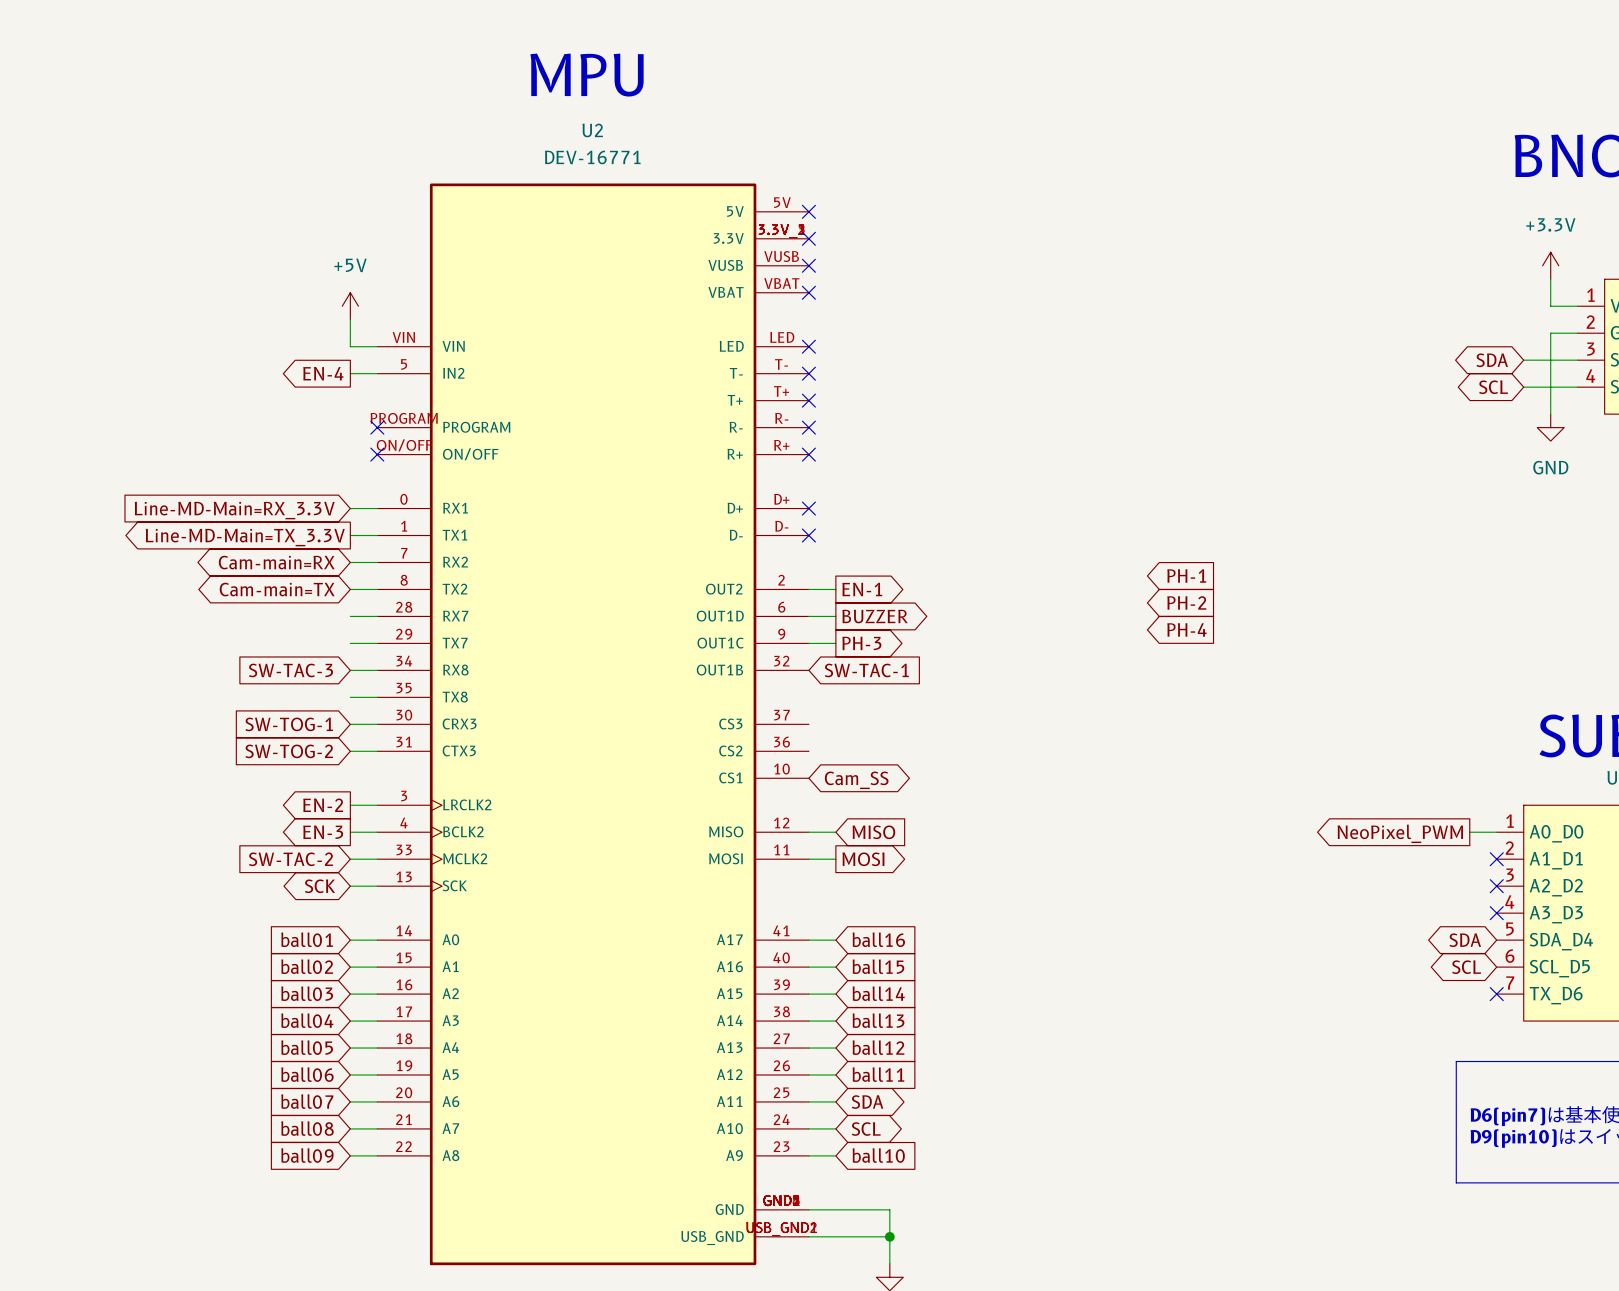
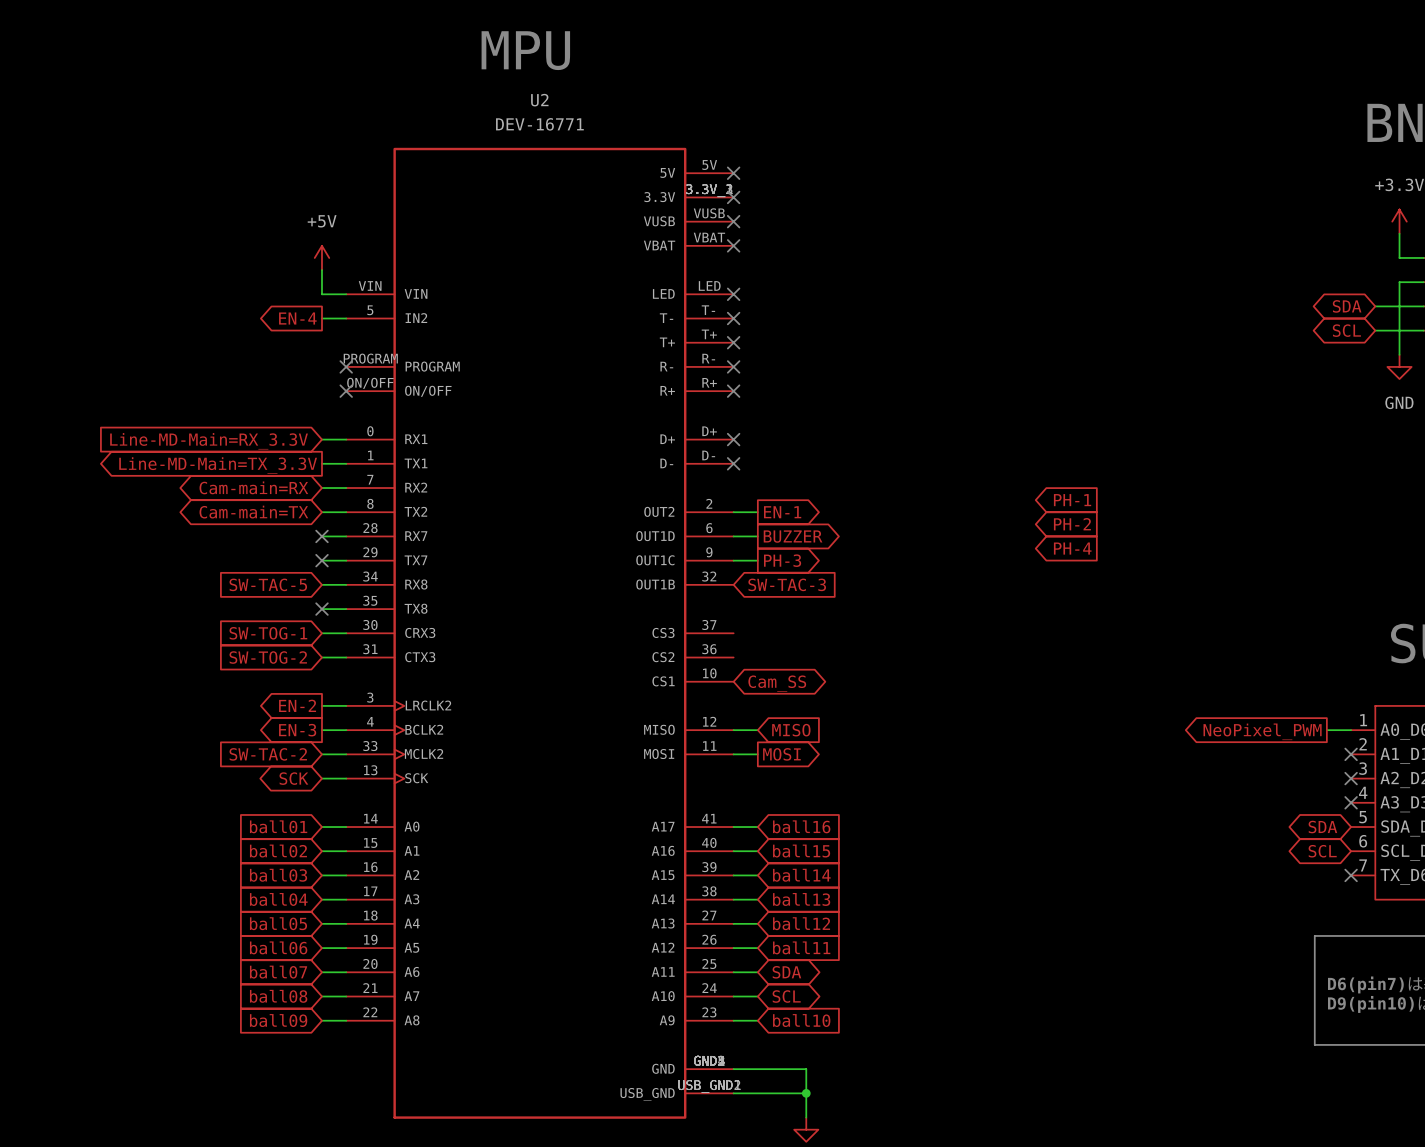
no-connect mark: none -> (321, 536)
no-connect mark: none -> (321, 560)
global label: SW-TAC-3 (290, 670) -> SW-TAC-5 (268, 584)
global label: SW-TAC-1 (866, 670) -> SW-TAC-3 (787, 584)
no-connect mark: none -> (321, 609)

